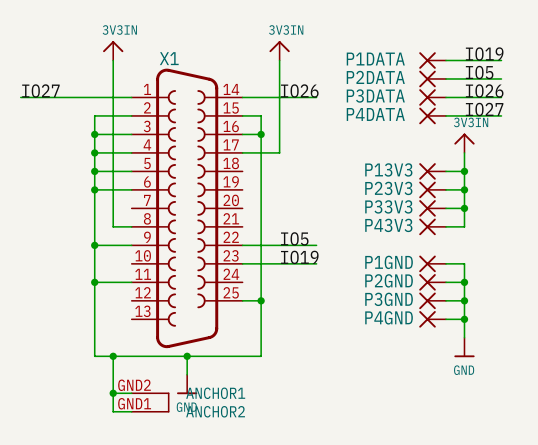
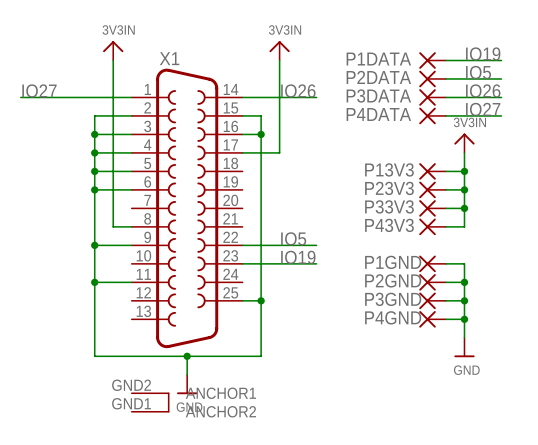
wire: (113, 356) (113, 411) (131, 411) -> none
junction: (113, 356) -> none
wire: (113, 393) (131, 393) -> none
junction: (113, 393) -> none

